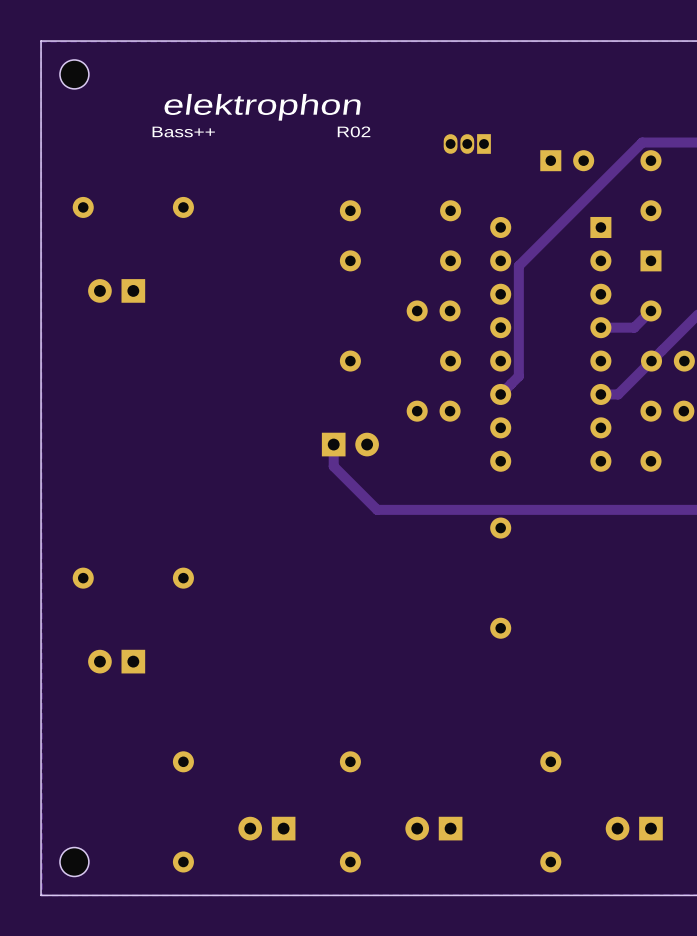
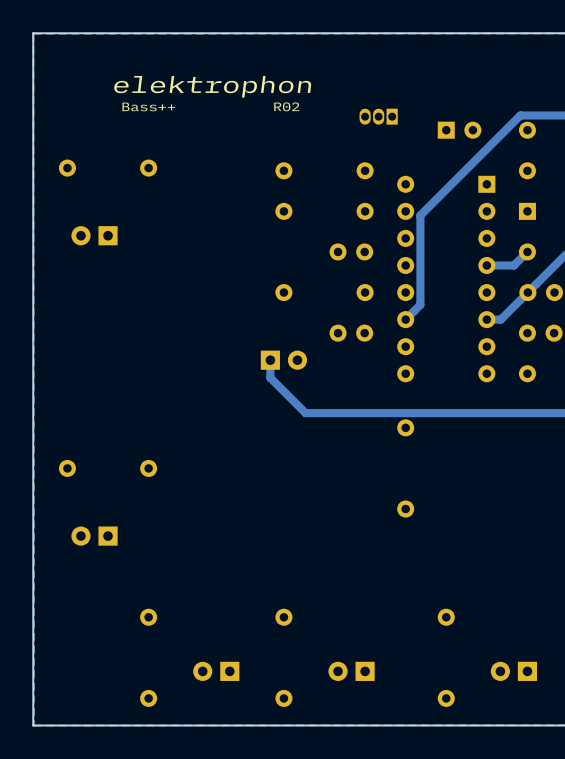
part: (74, 74) -> none
part: (74, 862) -> none

